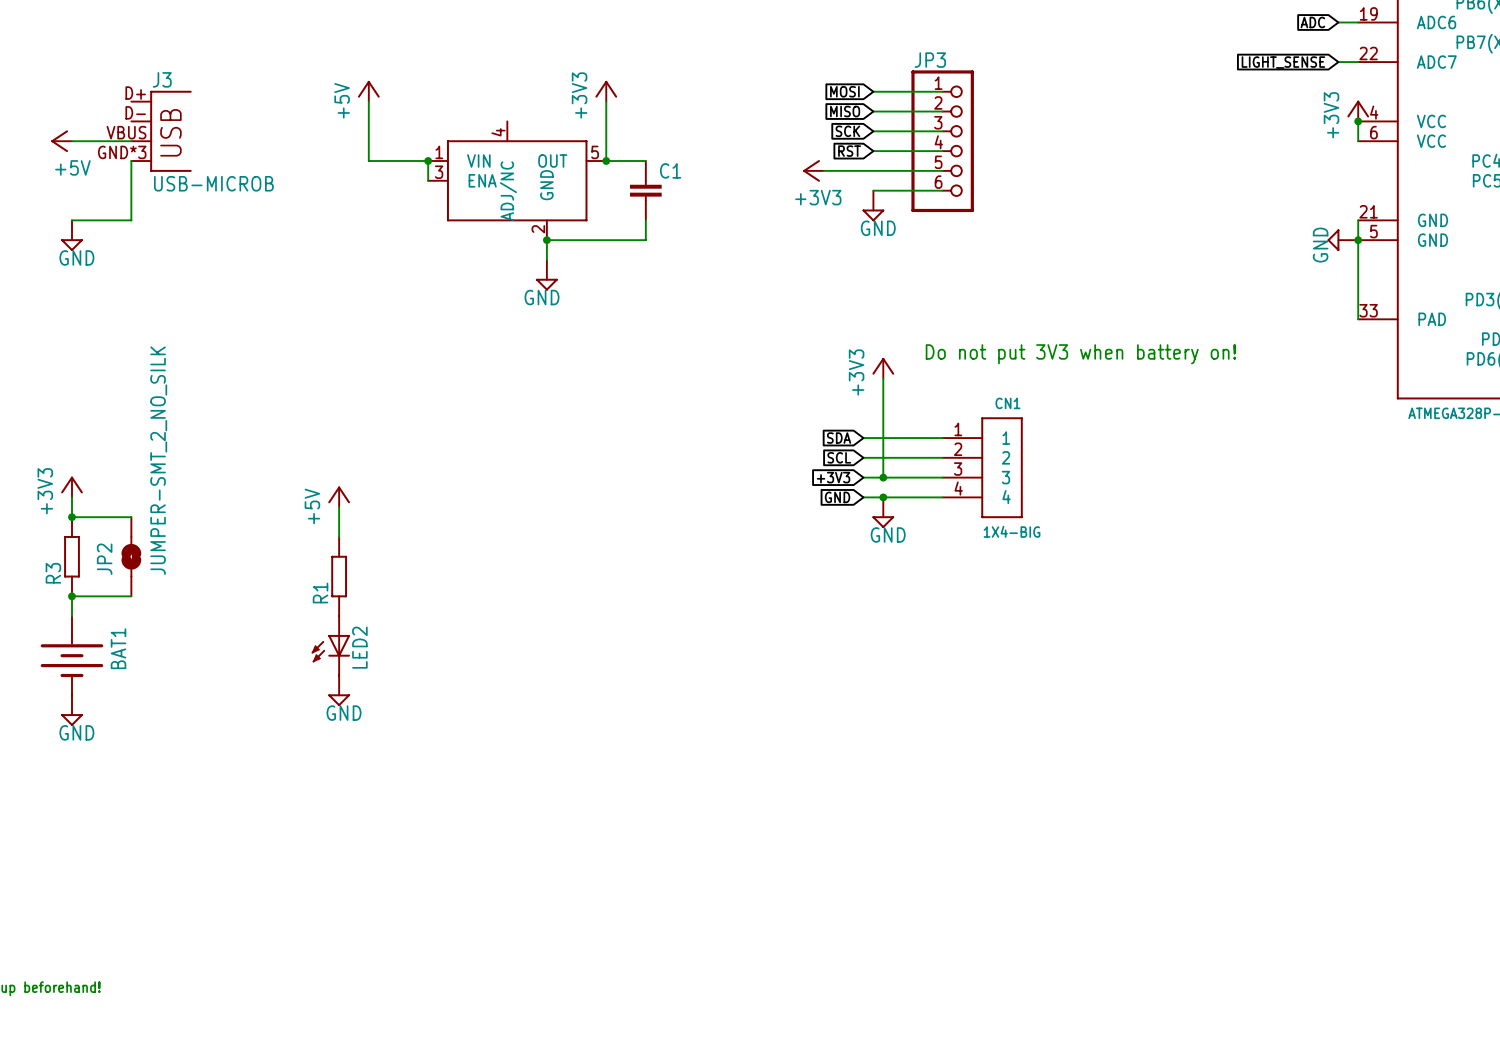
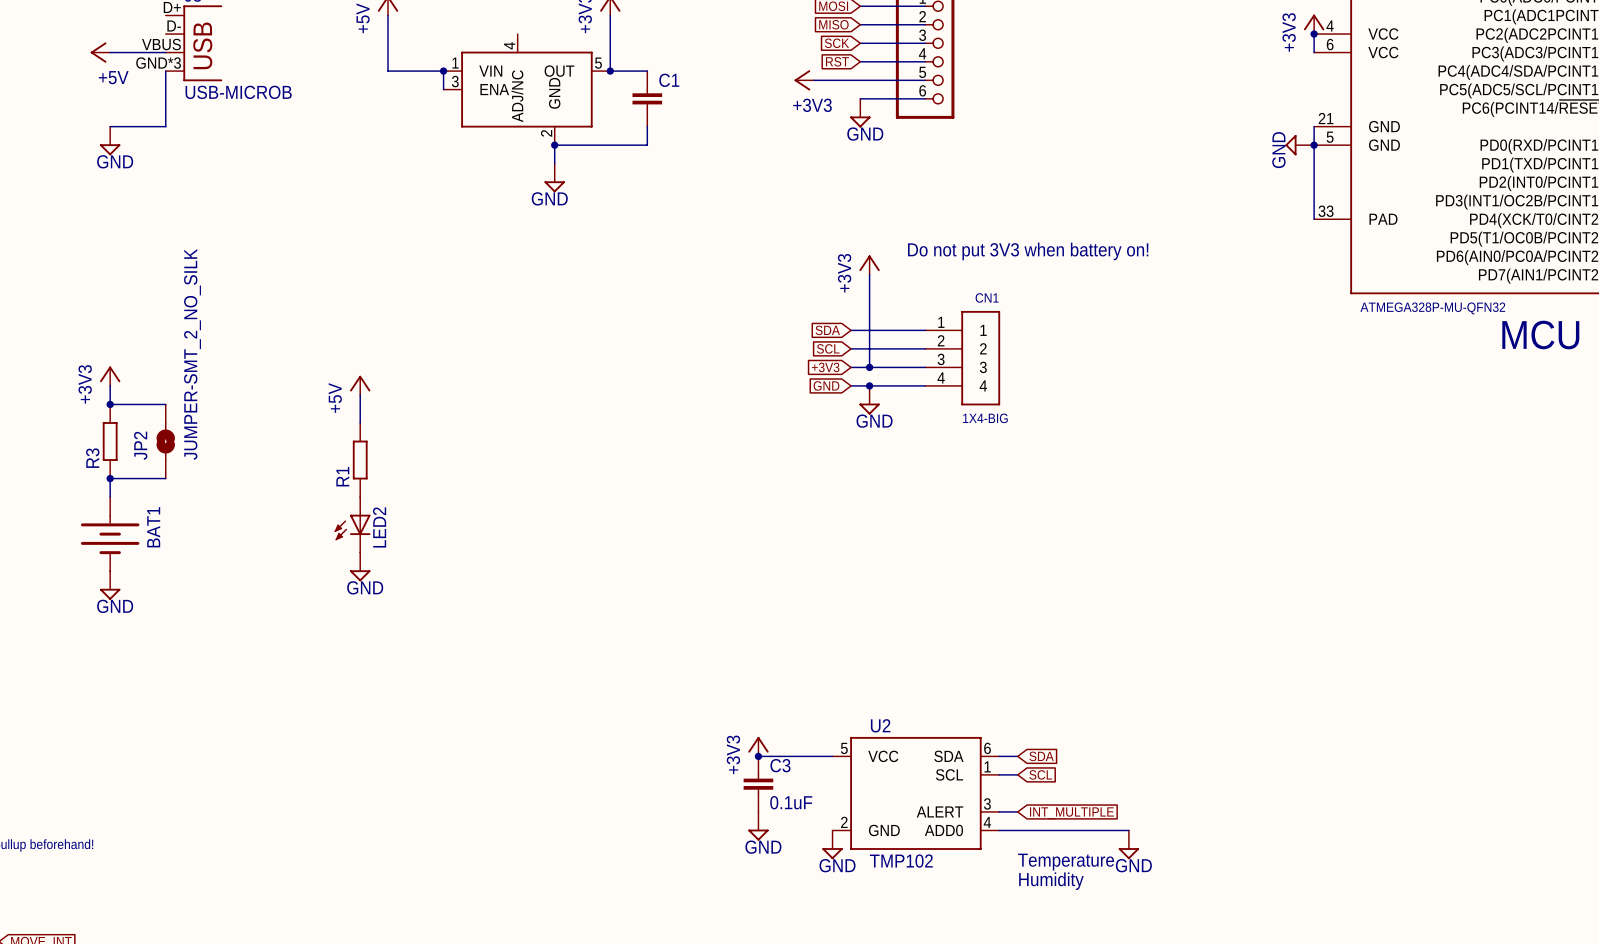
power symbol: none -> +3V3 (758, 746)
wire: none -> (758, 756) (832, 756)
junction: none -> (758, 756)
wire: none -> (999, 756) (1017, 756)
global label: none -> SDA (1041, 756)
wire: none -> (999, 774) (1017, 774)
global label: none -> SCL (1040, 774)
C3: none -> 0.1uF (758, 784)
U2: none -> TMP102 (915, 793)
wire: none -> (999, 811) (1017, 811)
global label: none -> INT_MULTIPLE (1071, 813)
power symbol: none -> GND (758, 826)
wire: none -> (999, 830) (1128, 830)
power symbol: none -> GND (832, 844)
power symbol: none -> GND (1128, 844)
text: none -> Temperature (1066, 862)
text: none -> Humidity (1051, 881)

